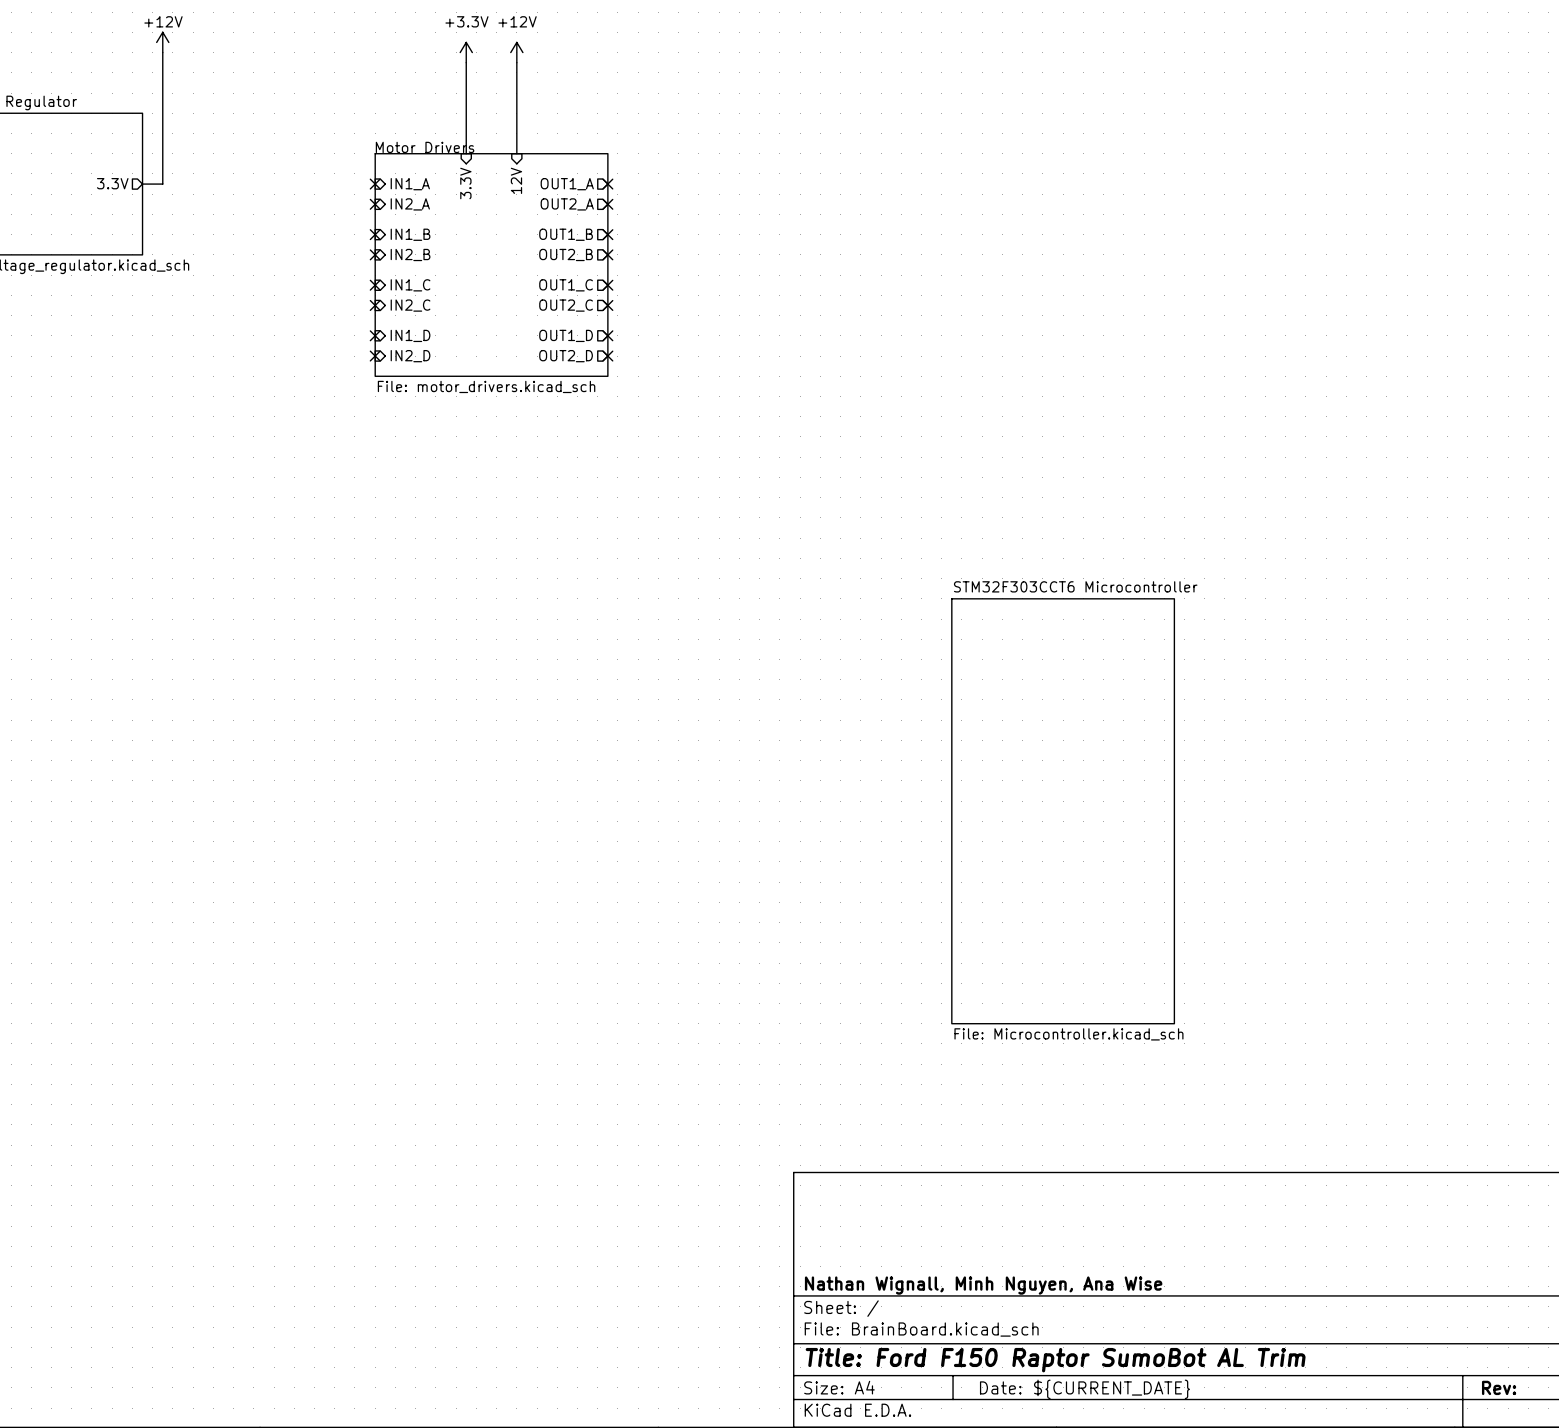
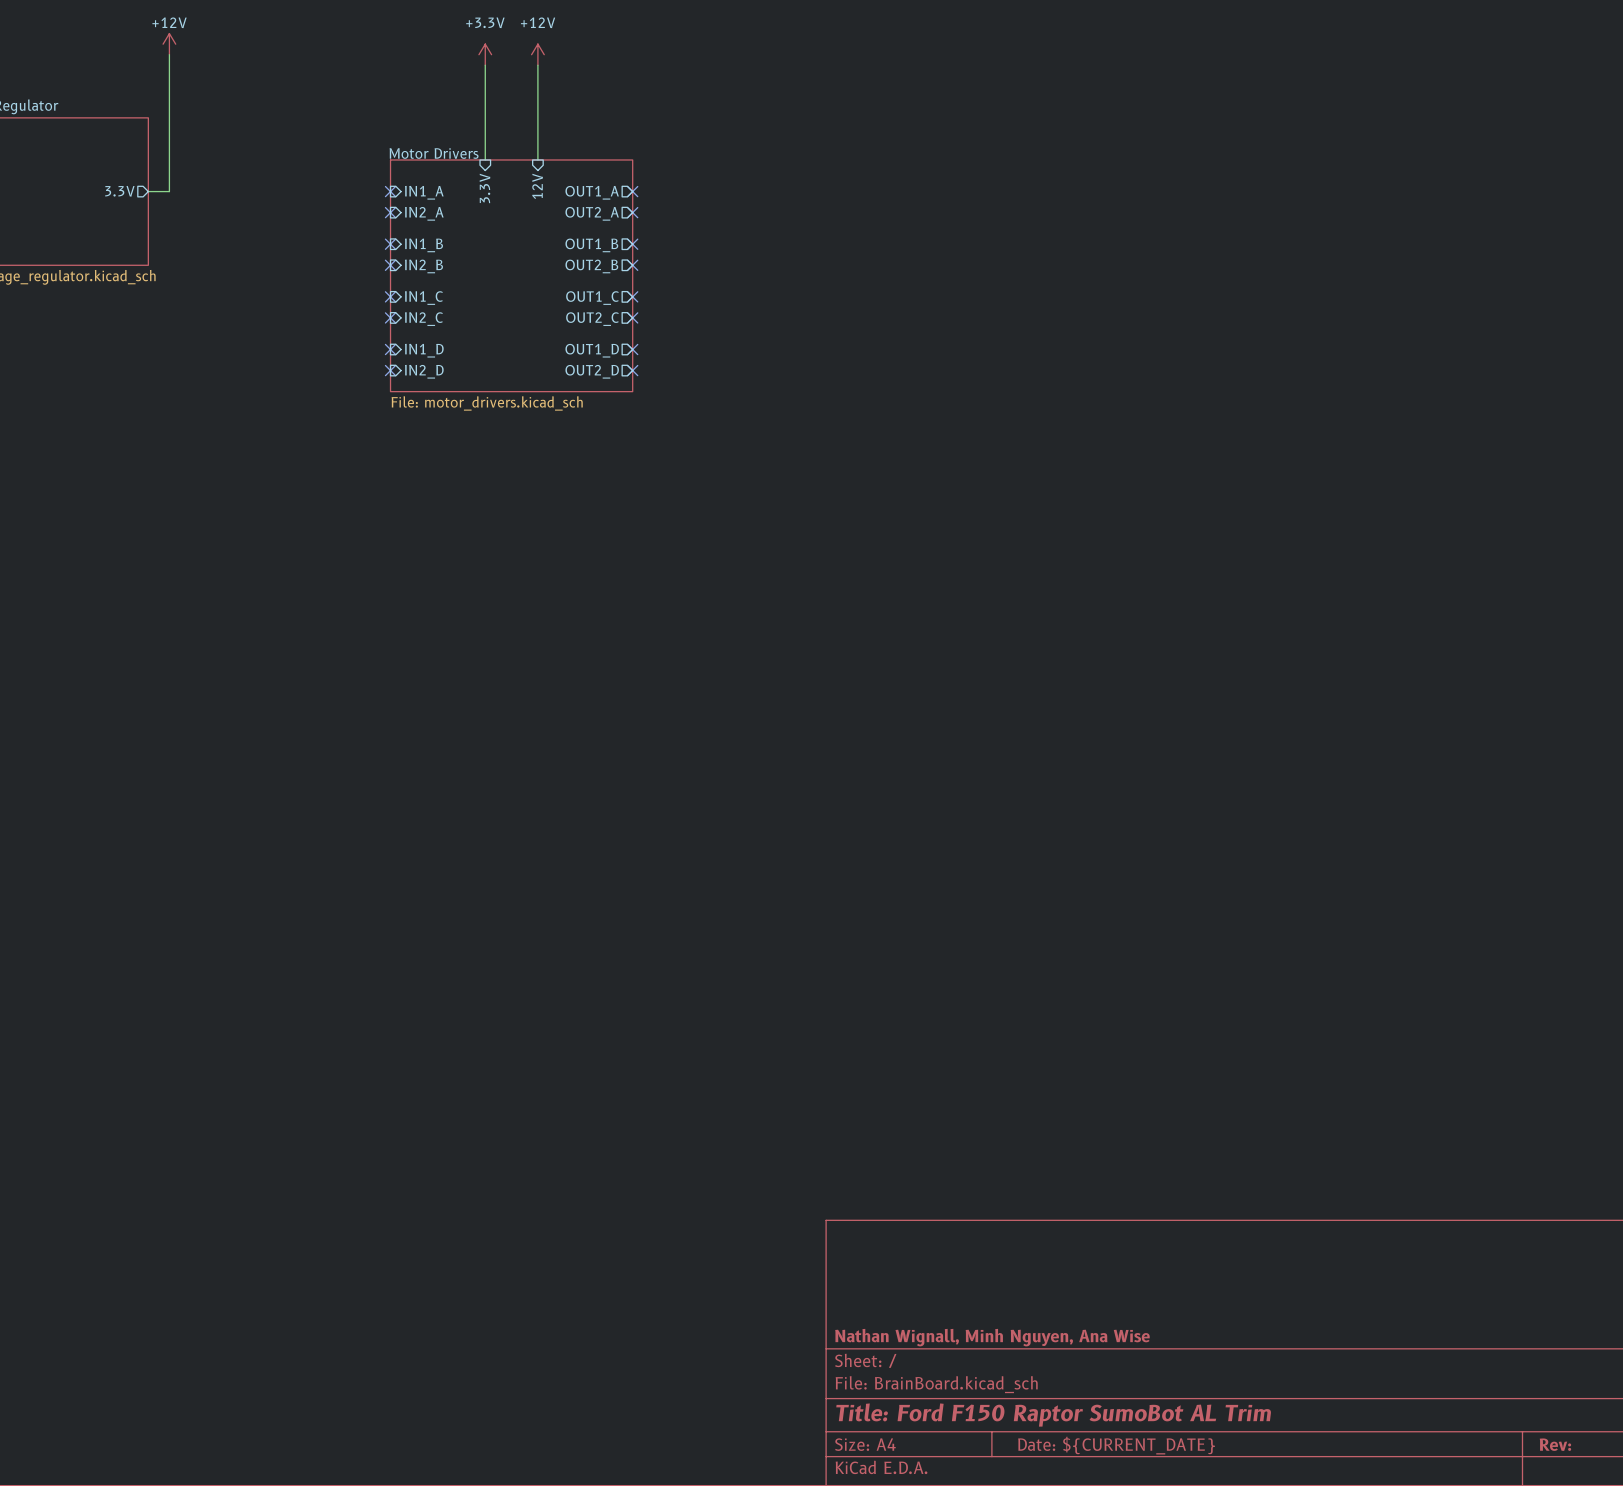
sheet STM32F303CCT6 Microcontroller: File: Microcontroller.kicad_sch (1063, 811) -> none

